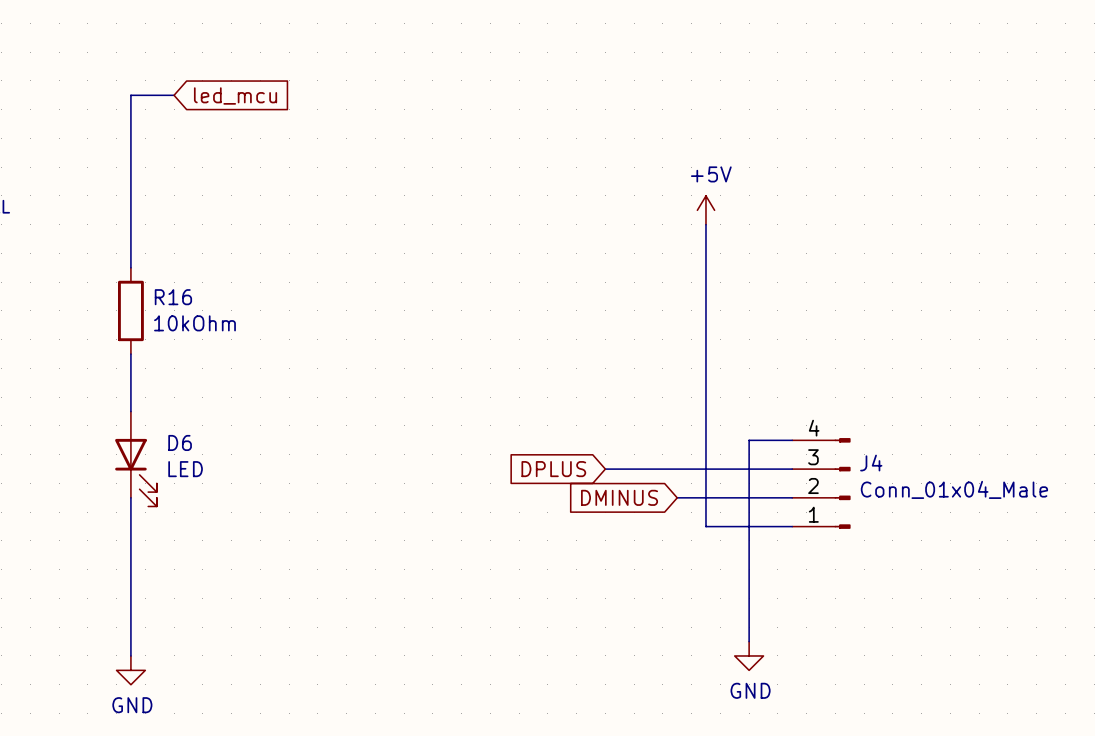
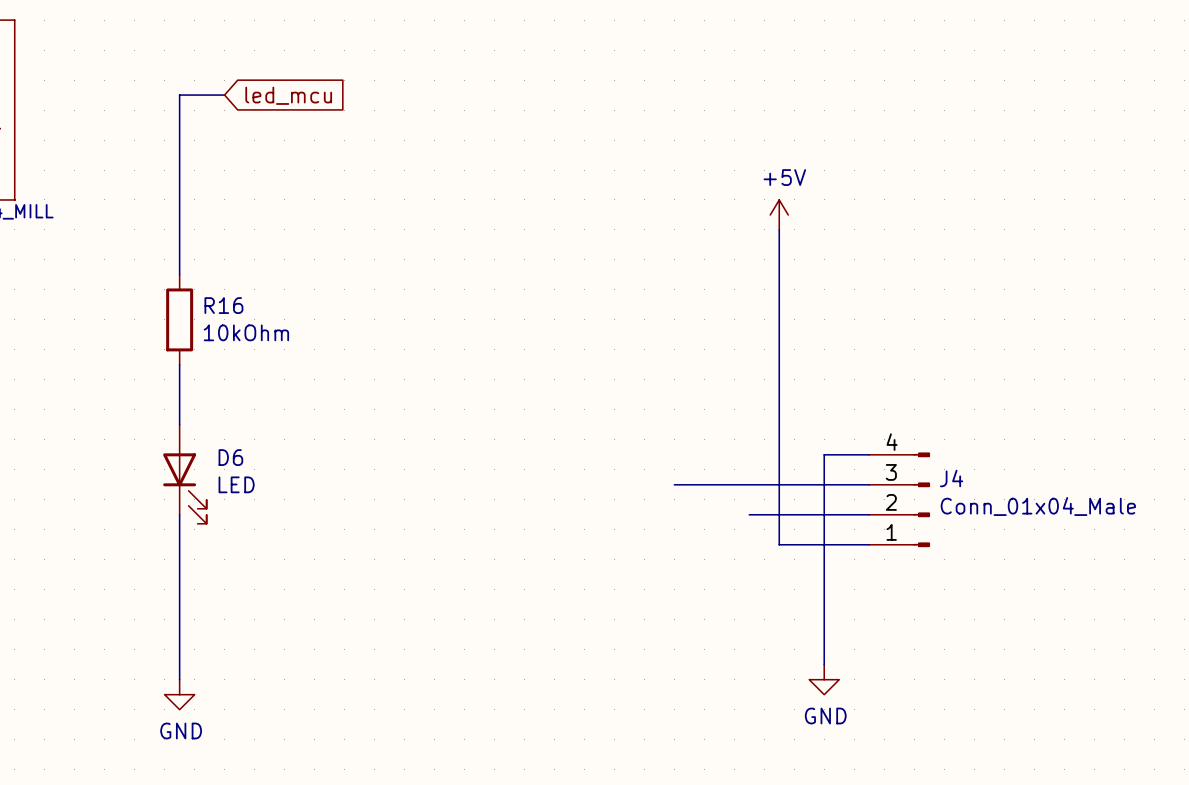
global label: DPLUS (553, 469) -> none
global label: DMINUS (619, 497) -> none

